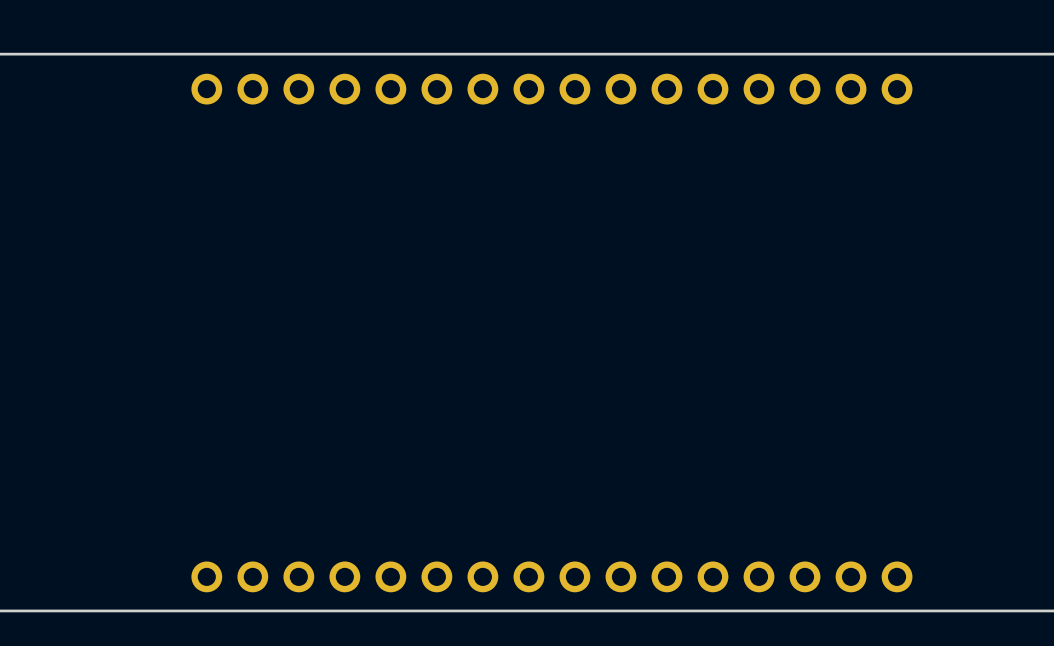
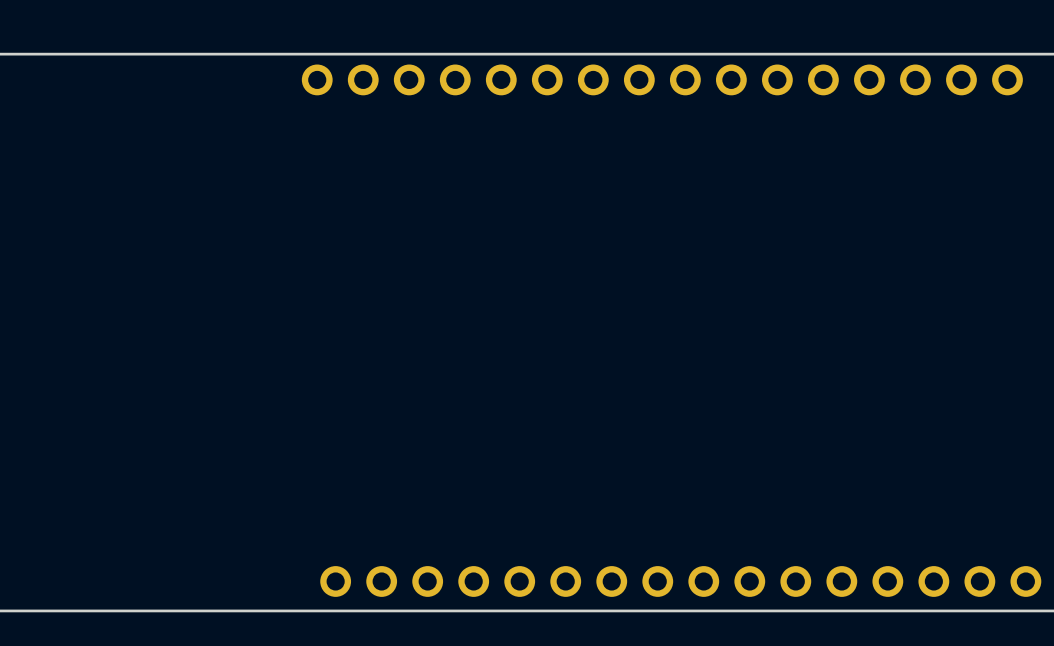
part: none -> (478, 79)
part: none -> (754, 79)
part: none -> (938, 79)
part: (275, 89) -> none
part: (459, 89) -> none
part: (735, 89) -> none
part position: (321, 576) -> (450, 581)
part: (505, 576) -> none
part position: (735, 576) -> (772, 581)
part: none -> (1002, 581)

